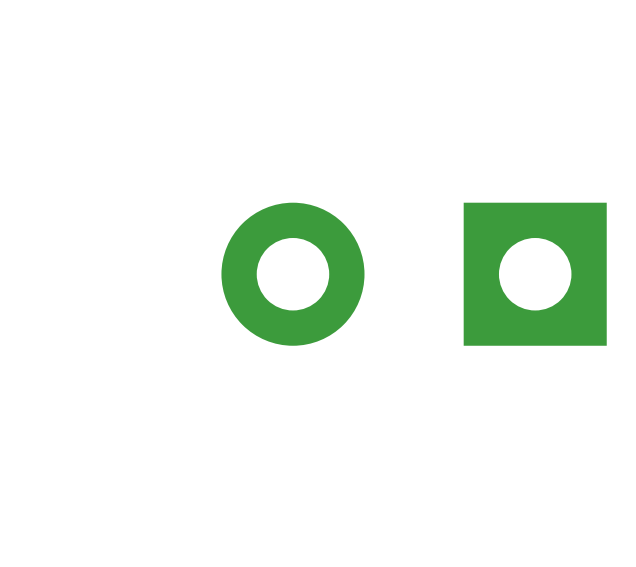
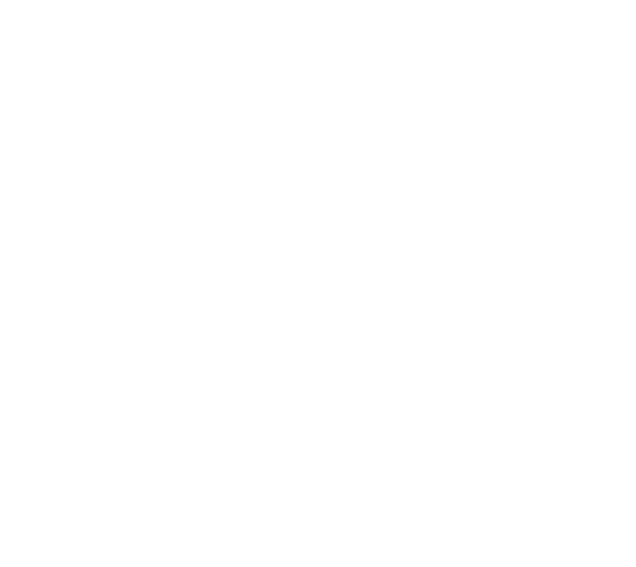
part: (414, 274) -> none

